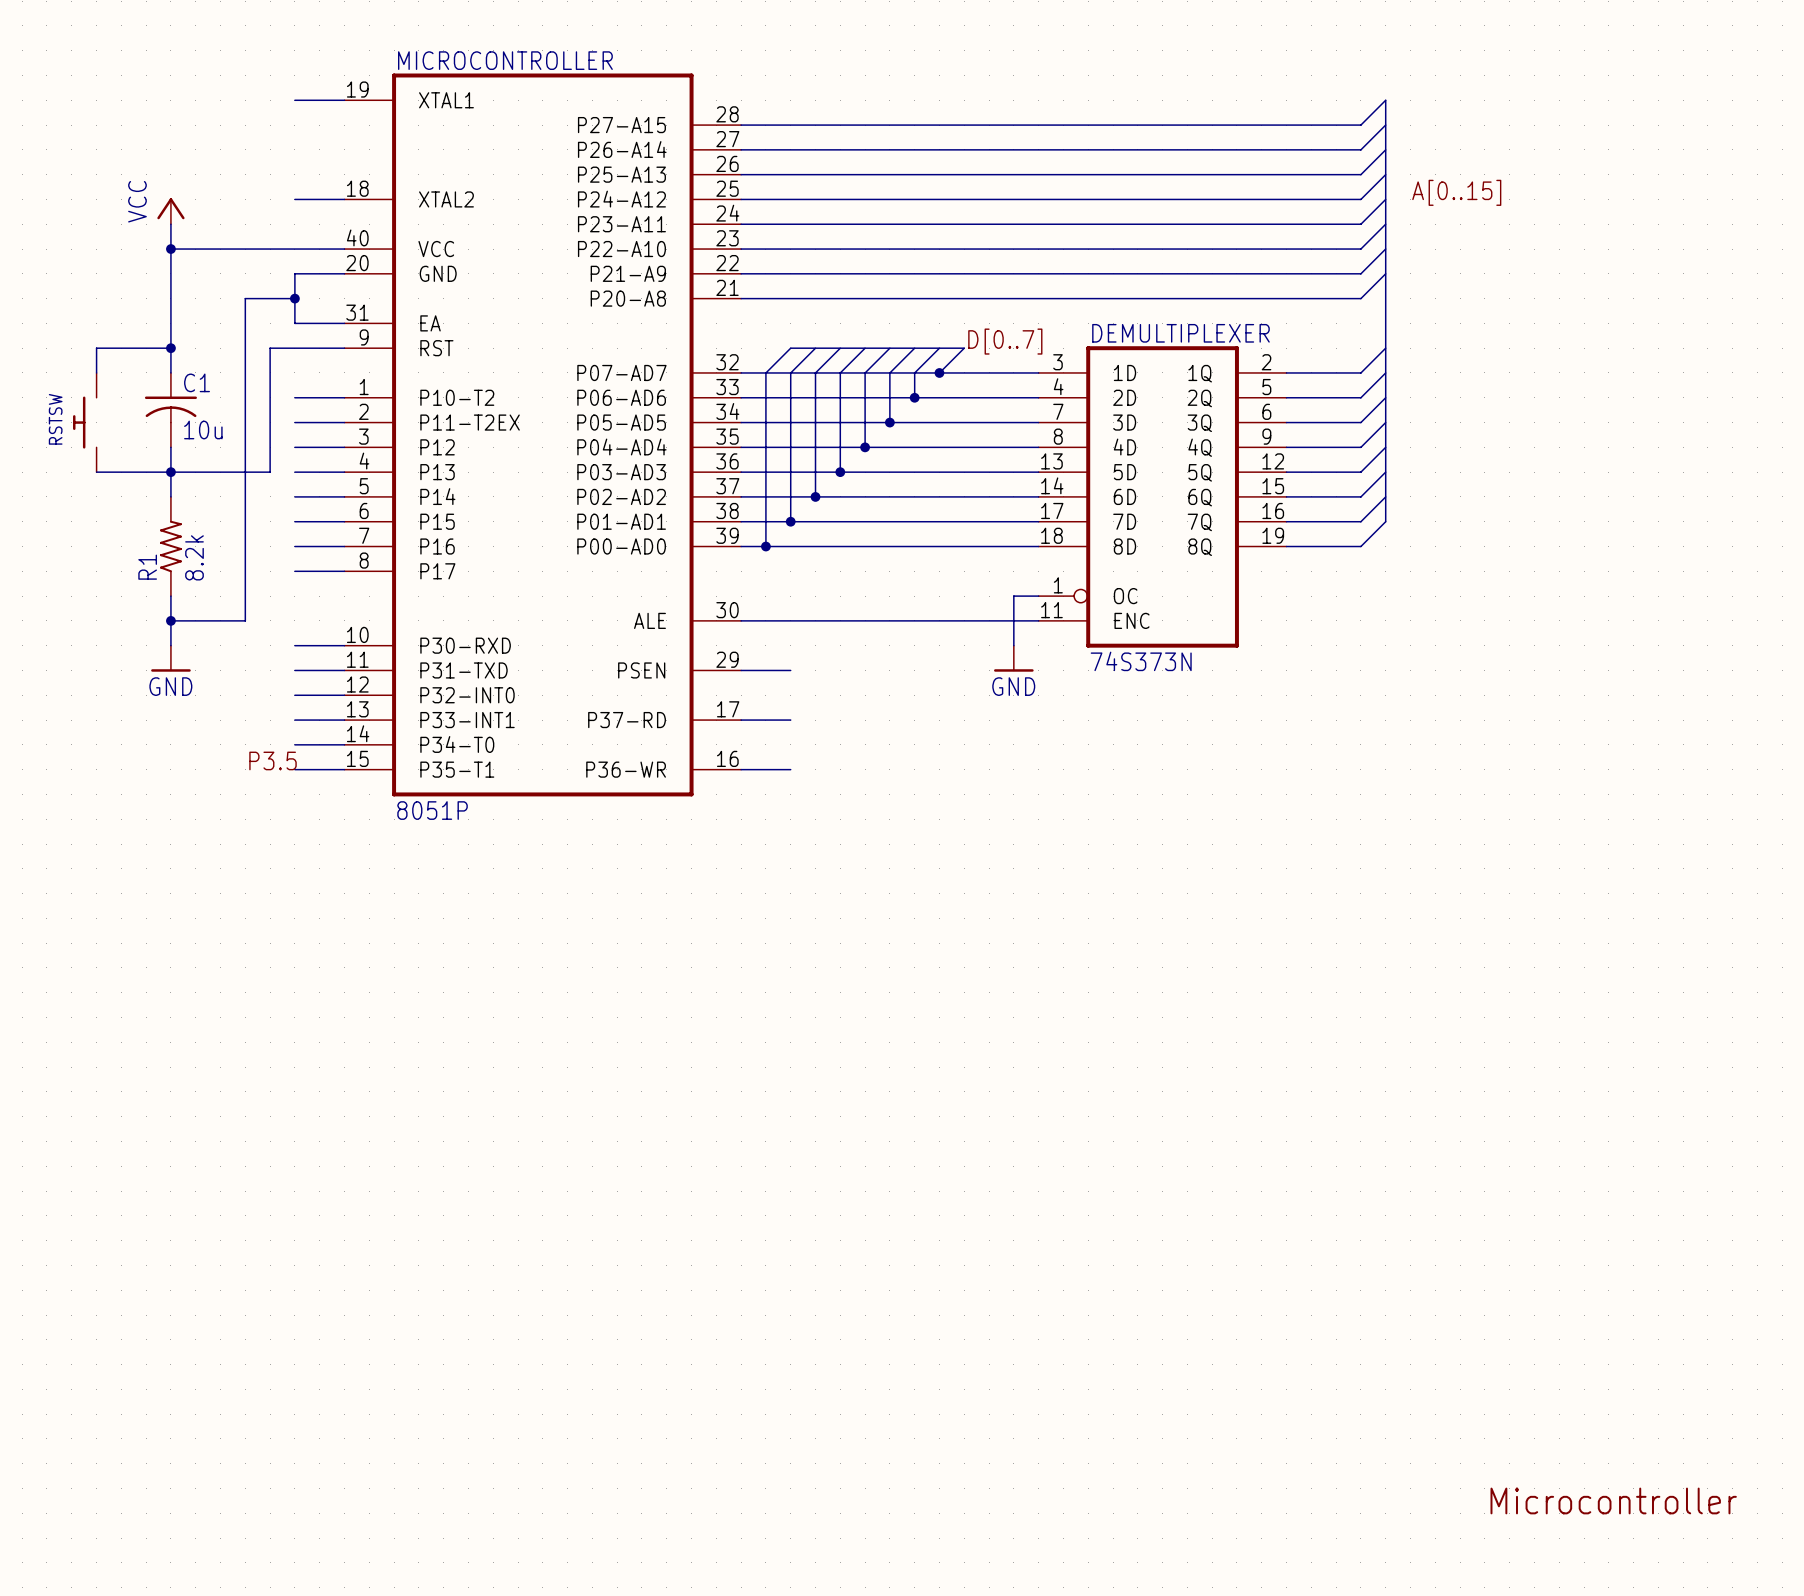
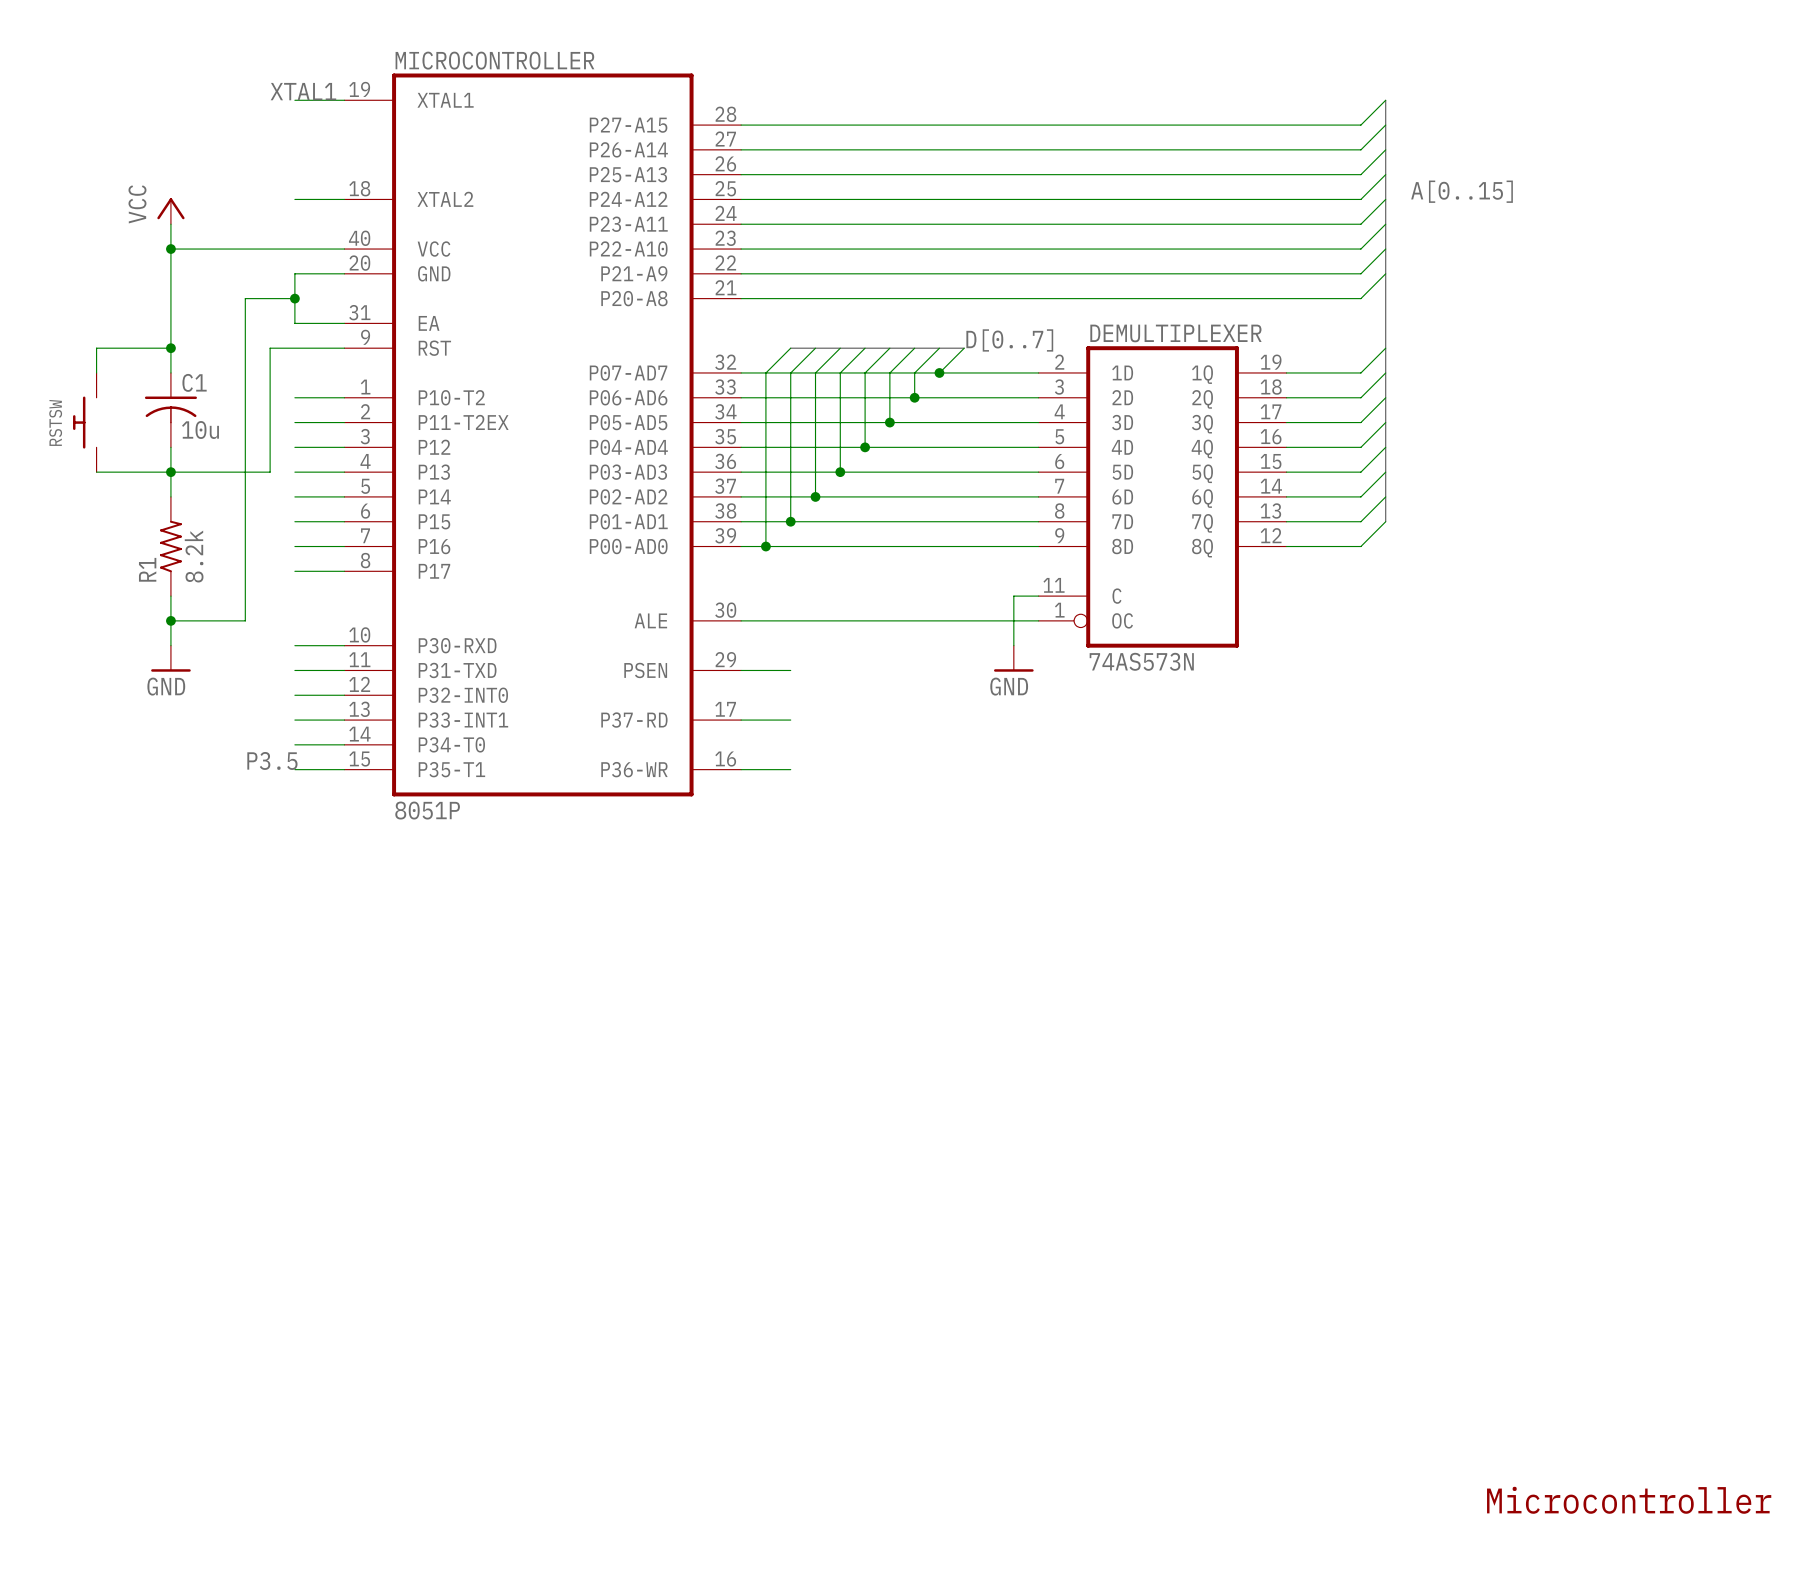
label: none -> XTAL1 (303, 91)
DEMULTIPLEXER symbol: [1038, 346, 1287, 648] -> [1038, 346, 1287, 648]
DEMULTIPLEXER value: 74S373N (1141, 661) -> 74AS573N (1141, 661)

